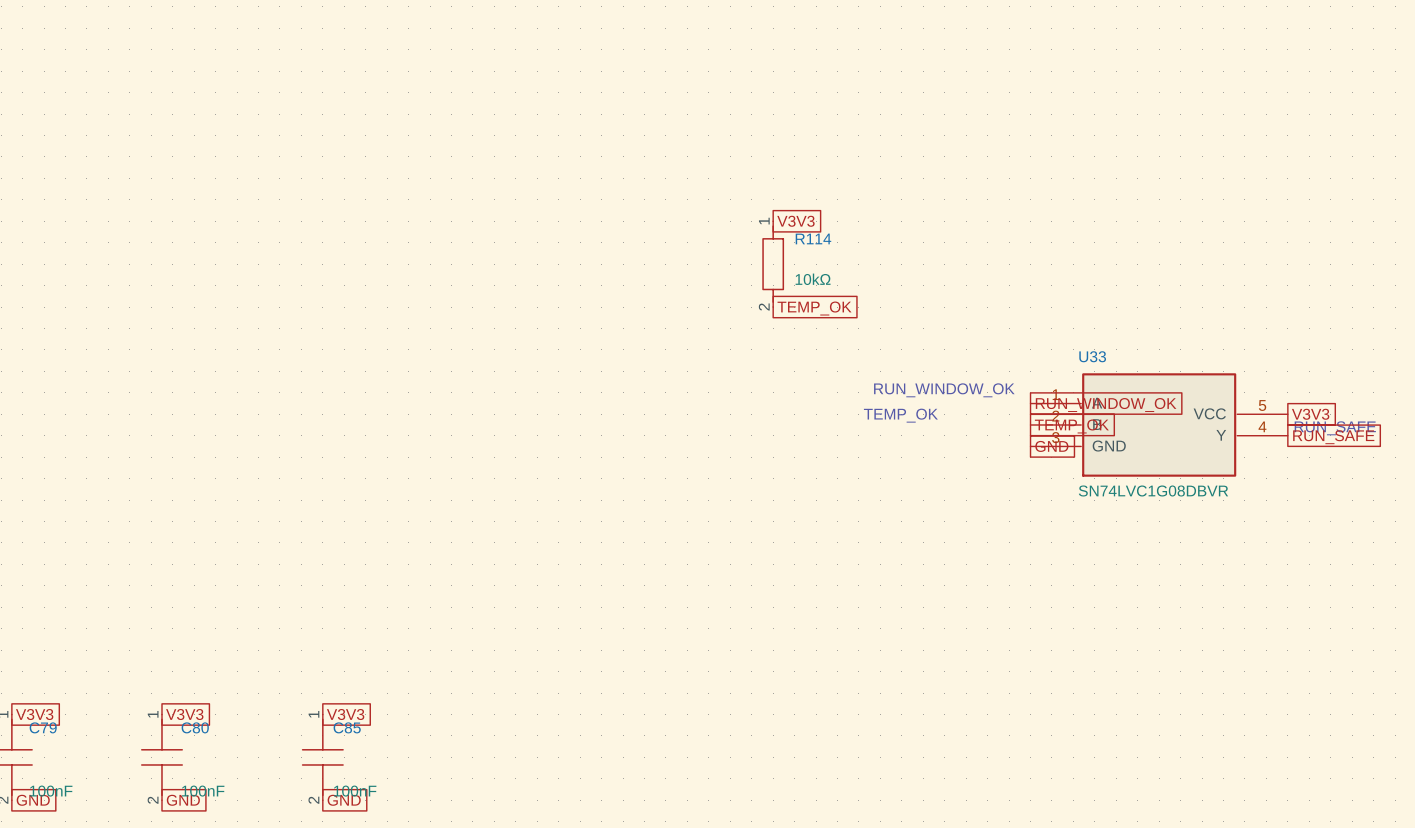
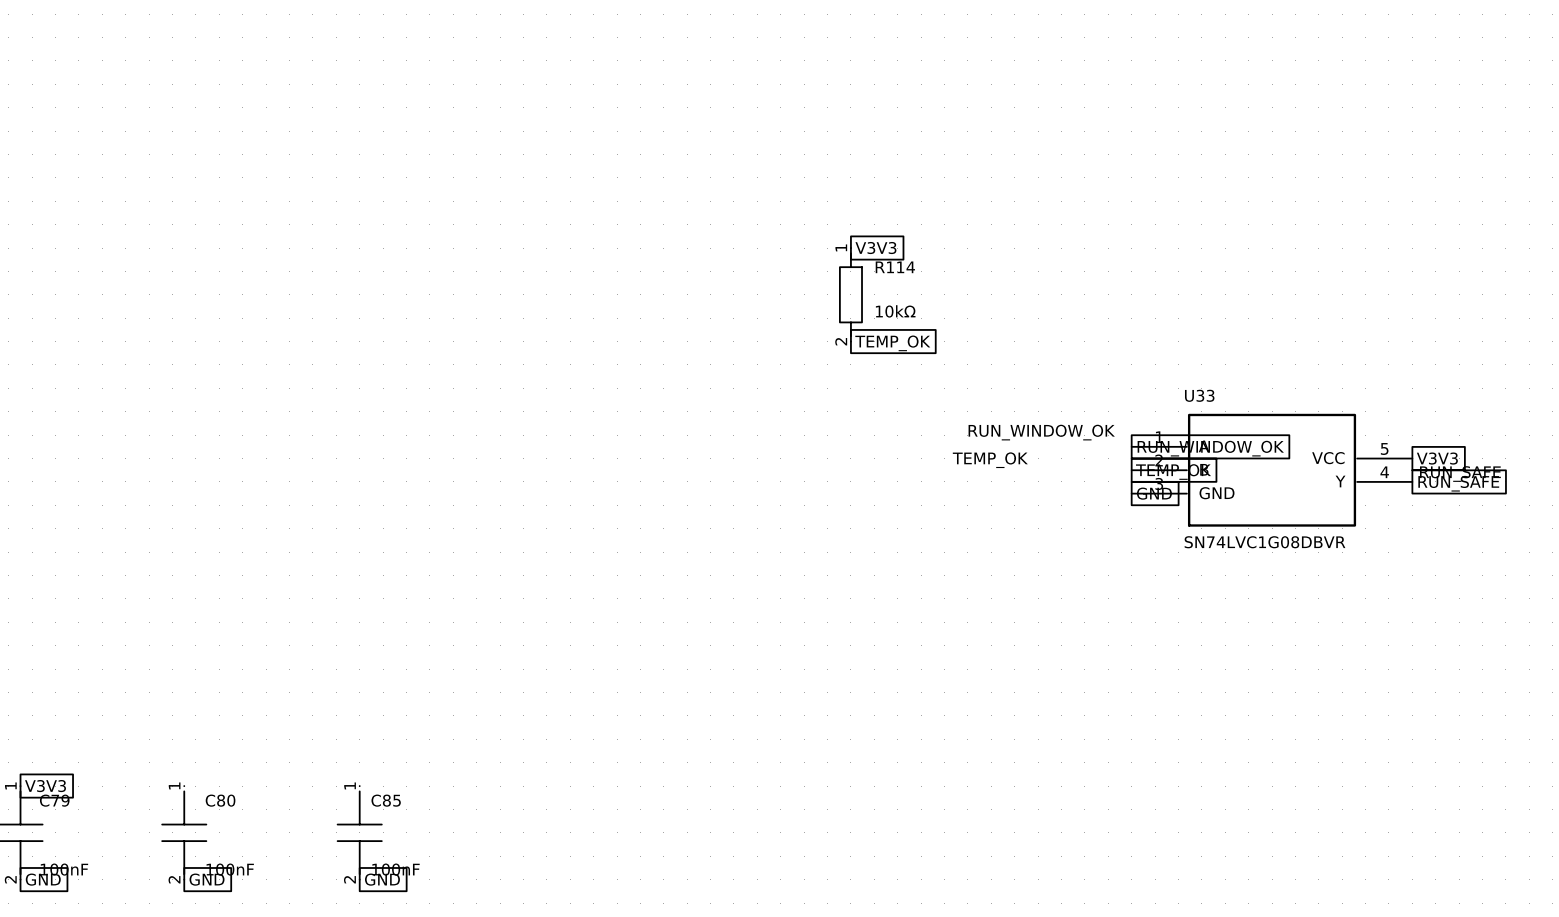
global label: V3V3 (184, 714) -> none
global label: V3V3 (345, 714) -> none

